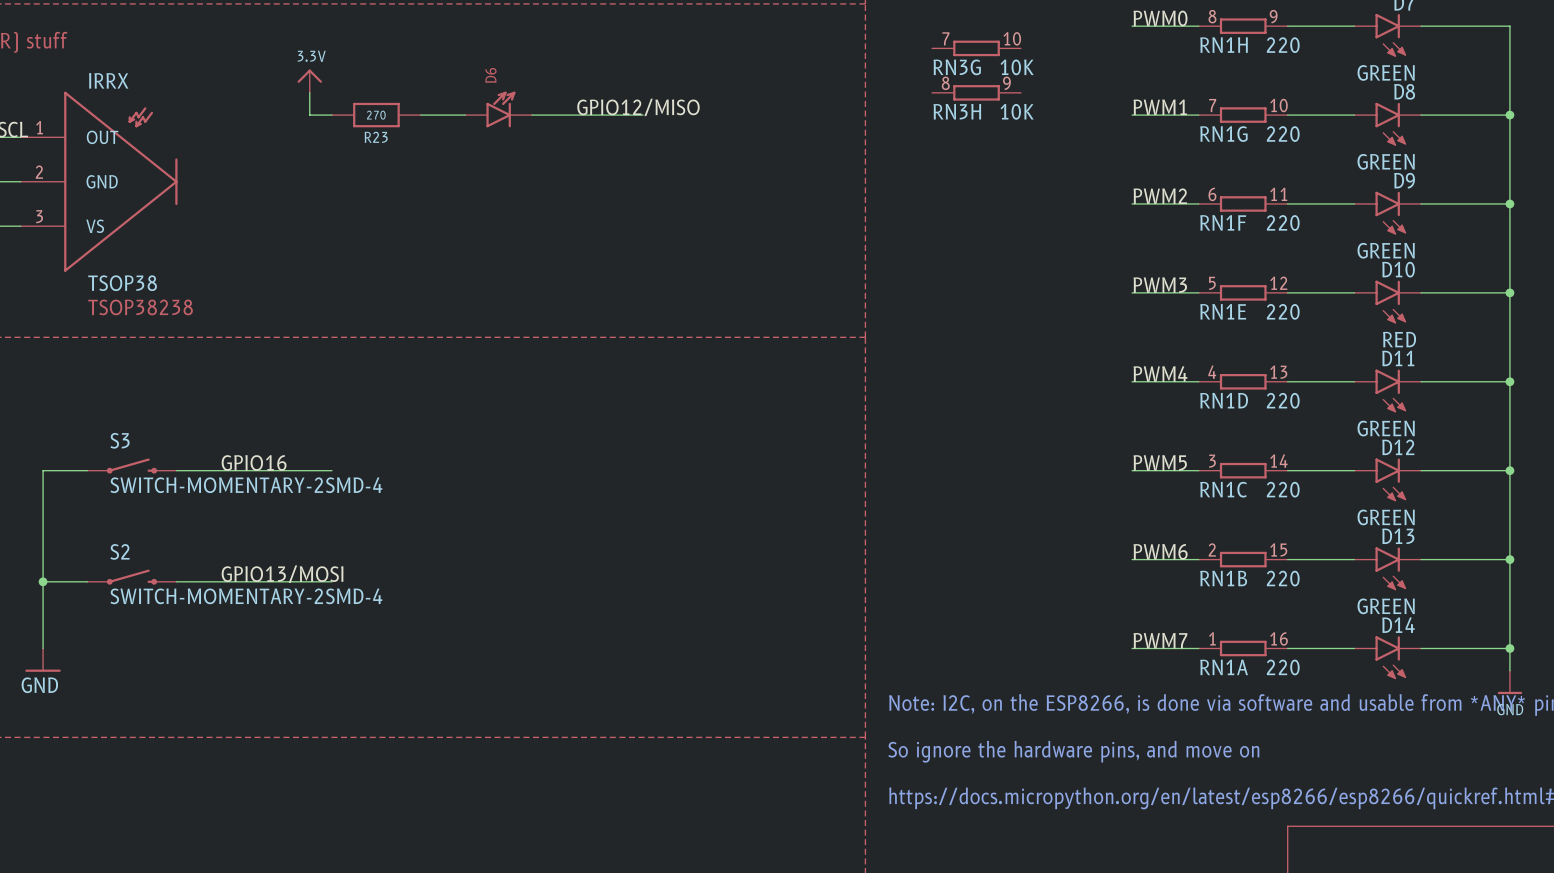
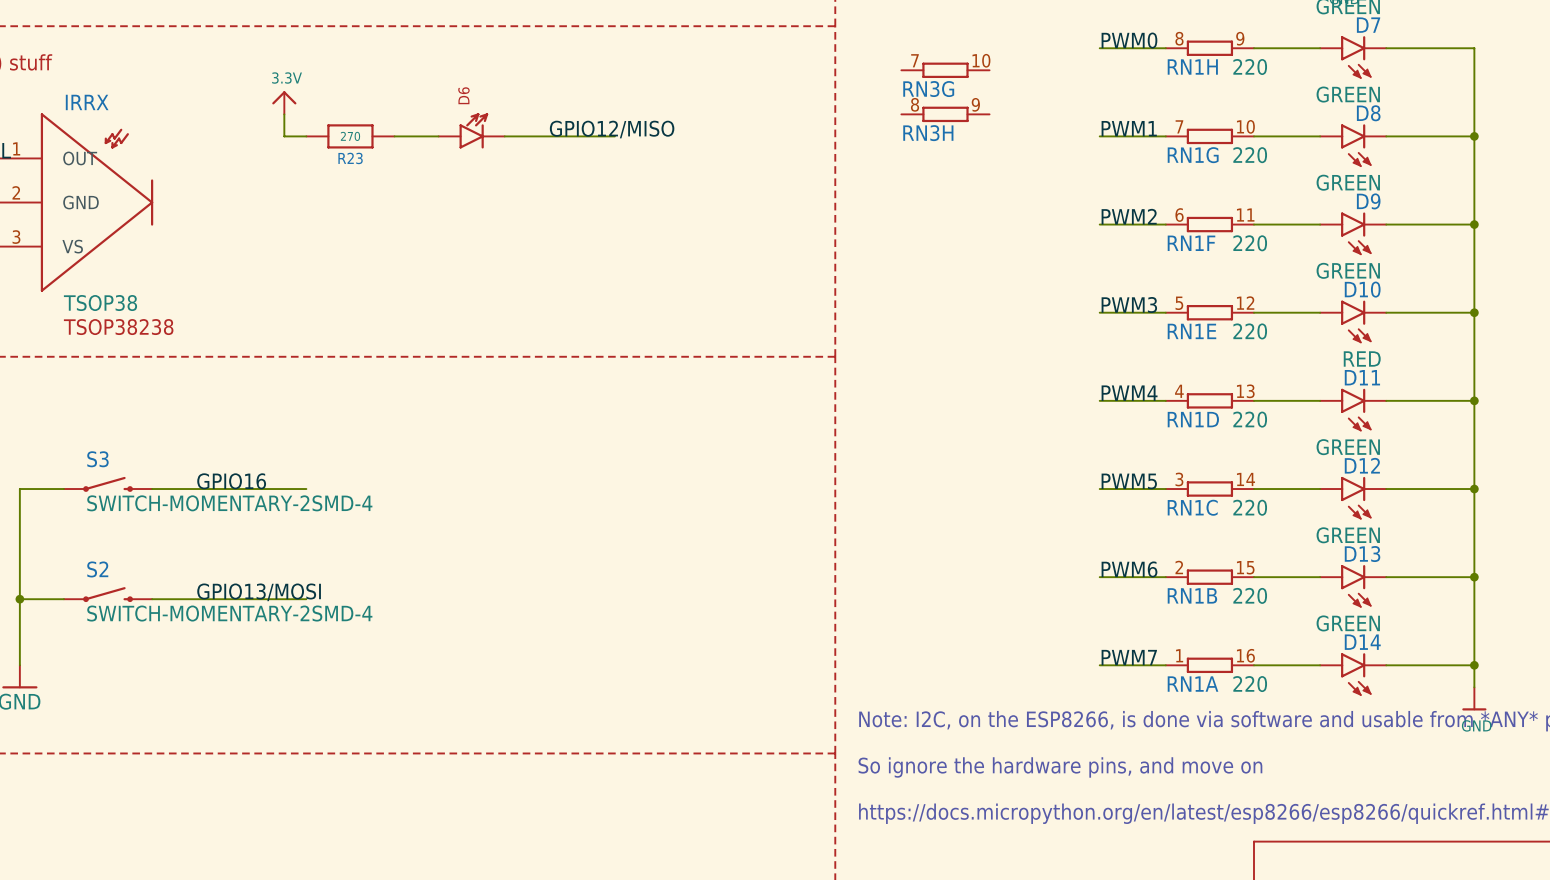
RN3G value: 10K (1017, 67) -> none
RN3H value: 10K (1017, 111) -> none

